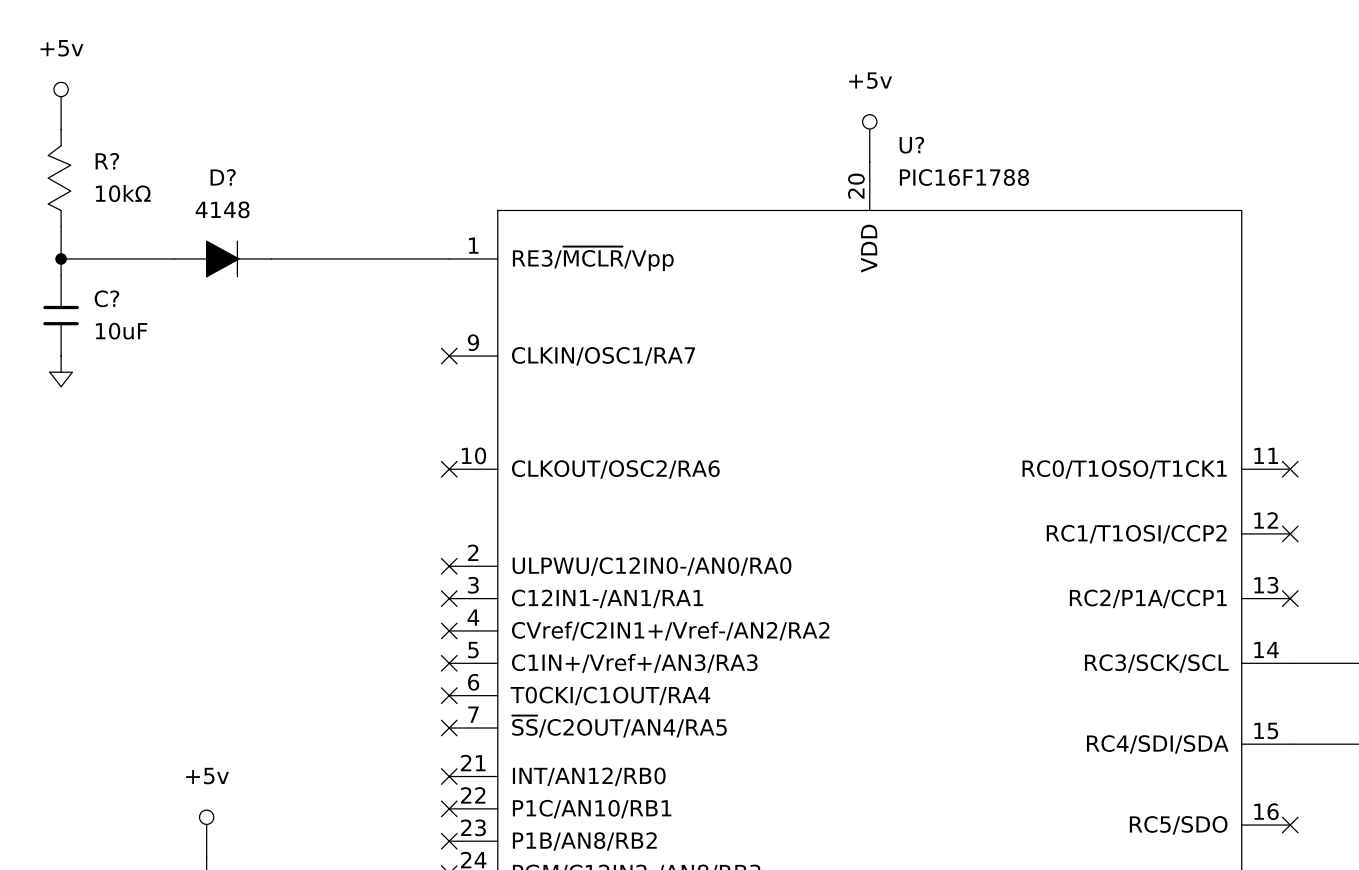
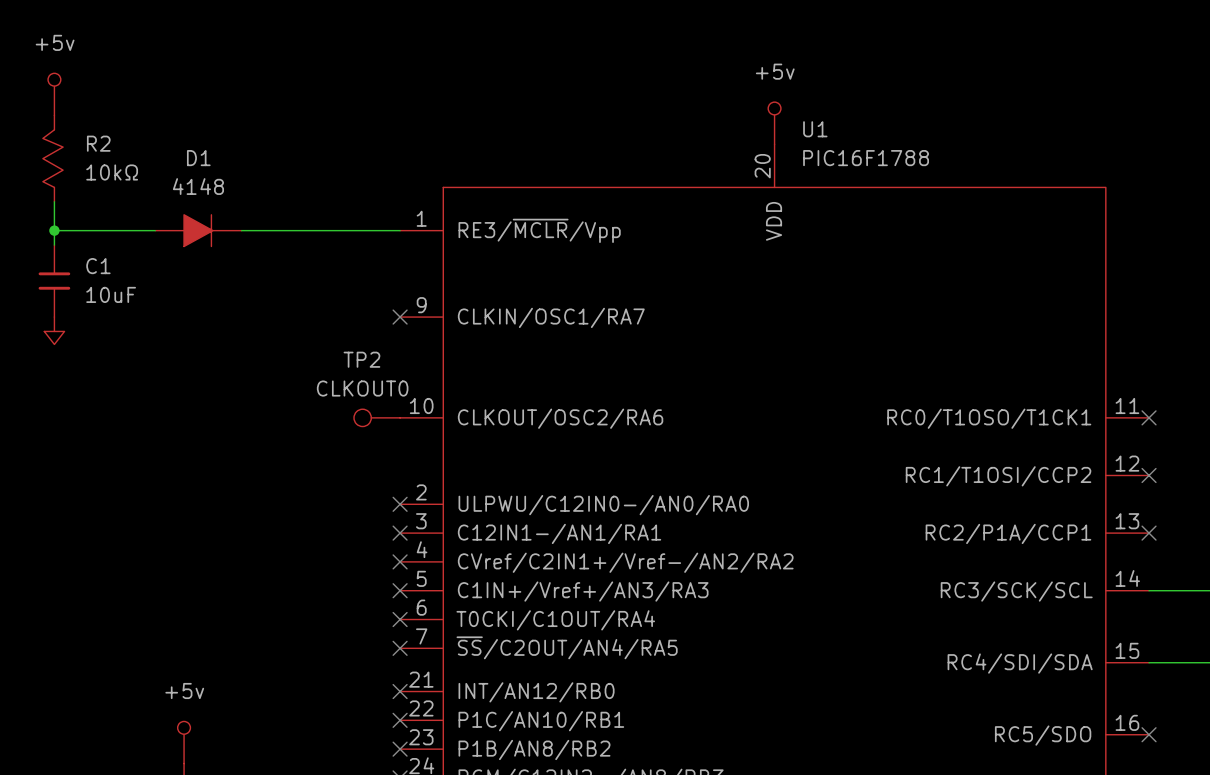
U? name: U? (911, 145) -> U1 (815, 129)
R? name: R? (107, 161) -> R2 (98, 143)
D? name: D? (223, 177) -> D1 (198, 158)
C? name: C? (106, 298) -> C1 (98, 266)
TP2: none -> CLKOUT0 (377, 417)
no-connect mark: (449, 469) -> none

